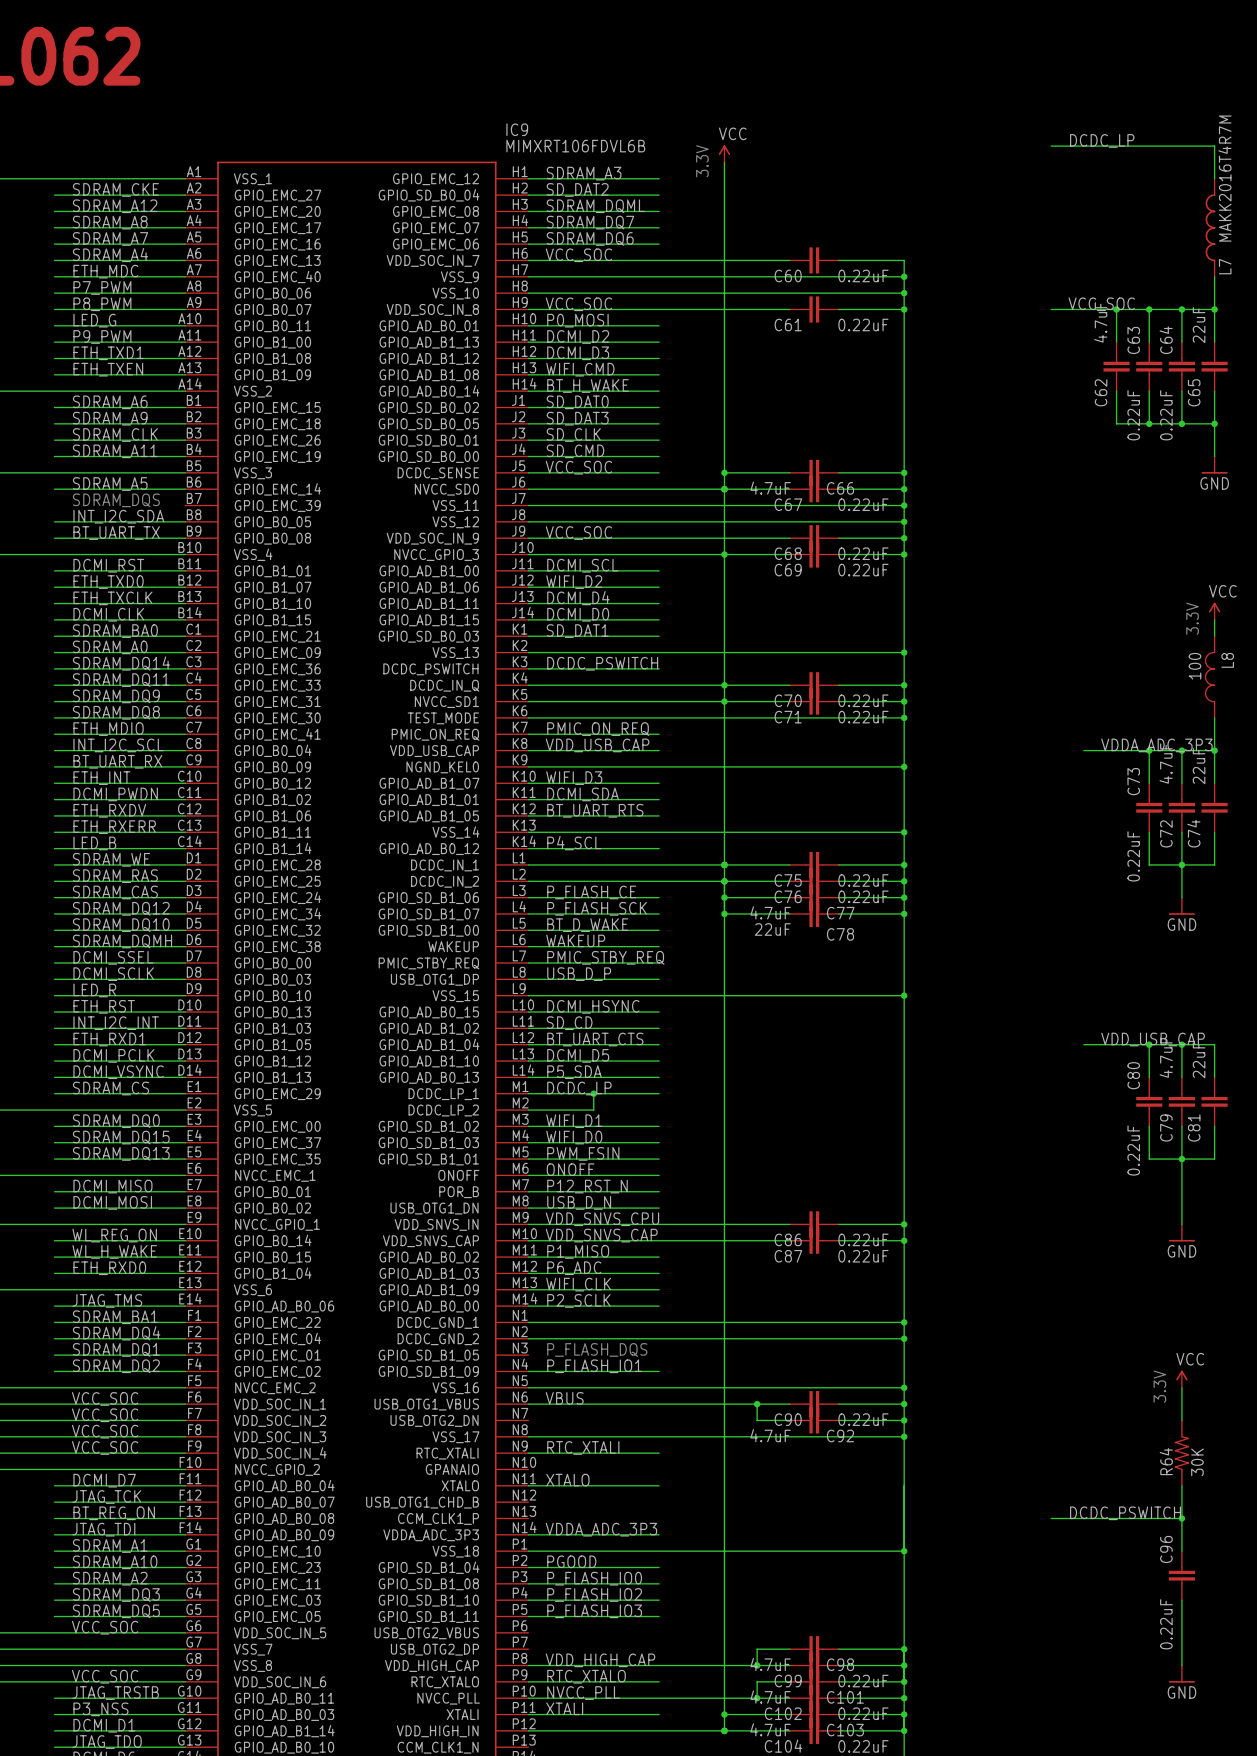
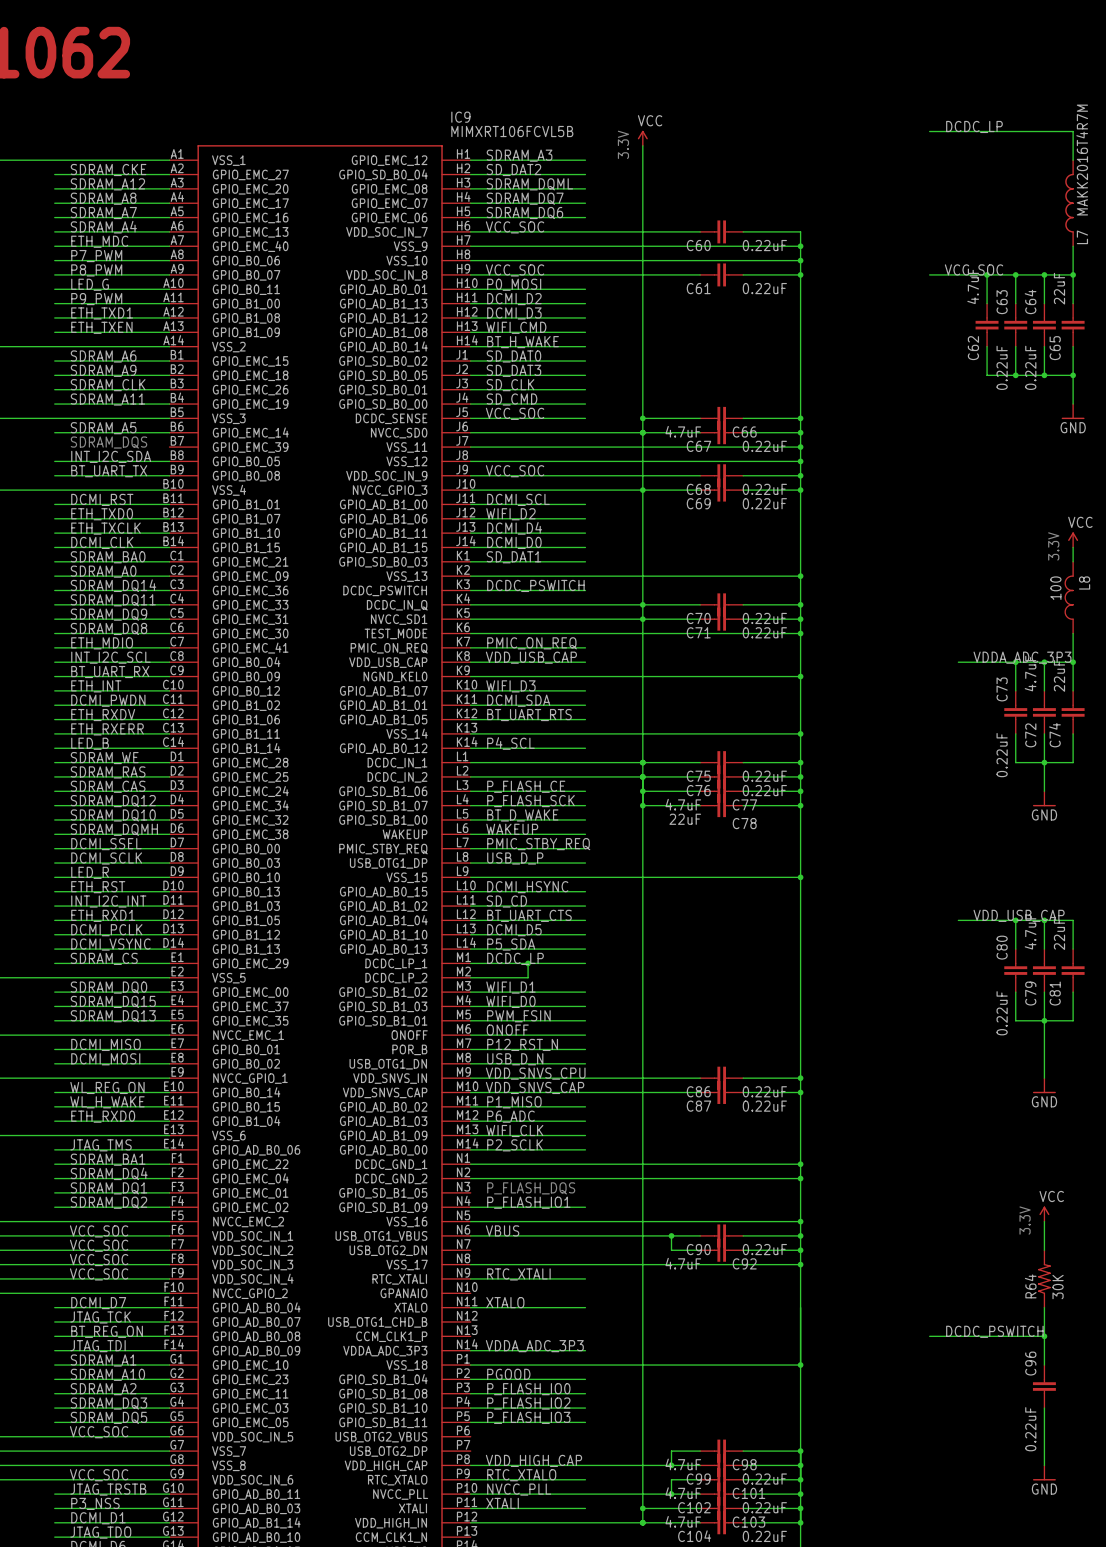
IC9 value: MIMXRT106FDVL6B (575, 146) -> MIMXRT106FCVL5B (512, 131)

